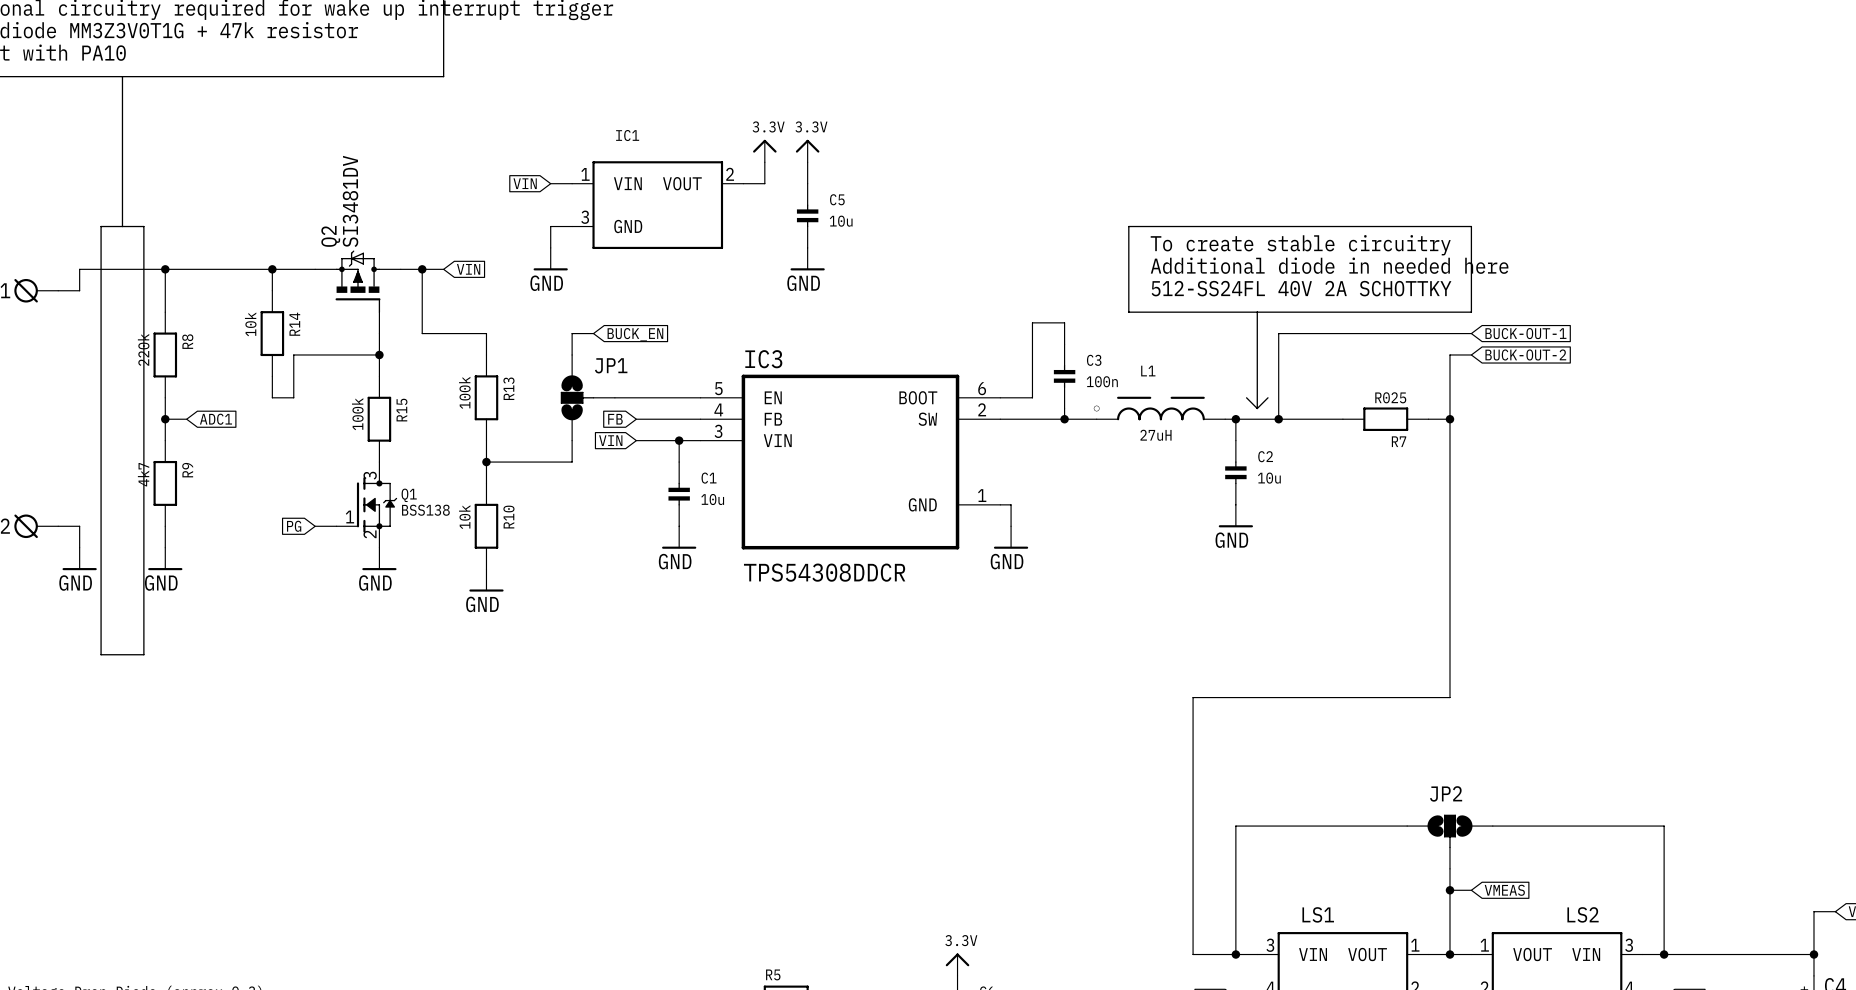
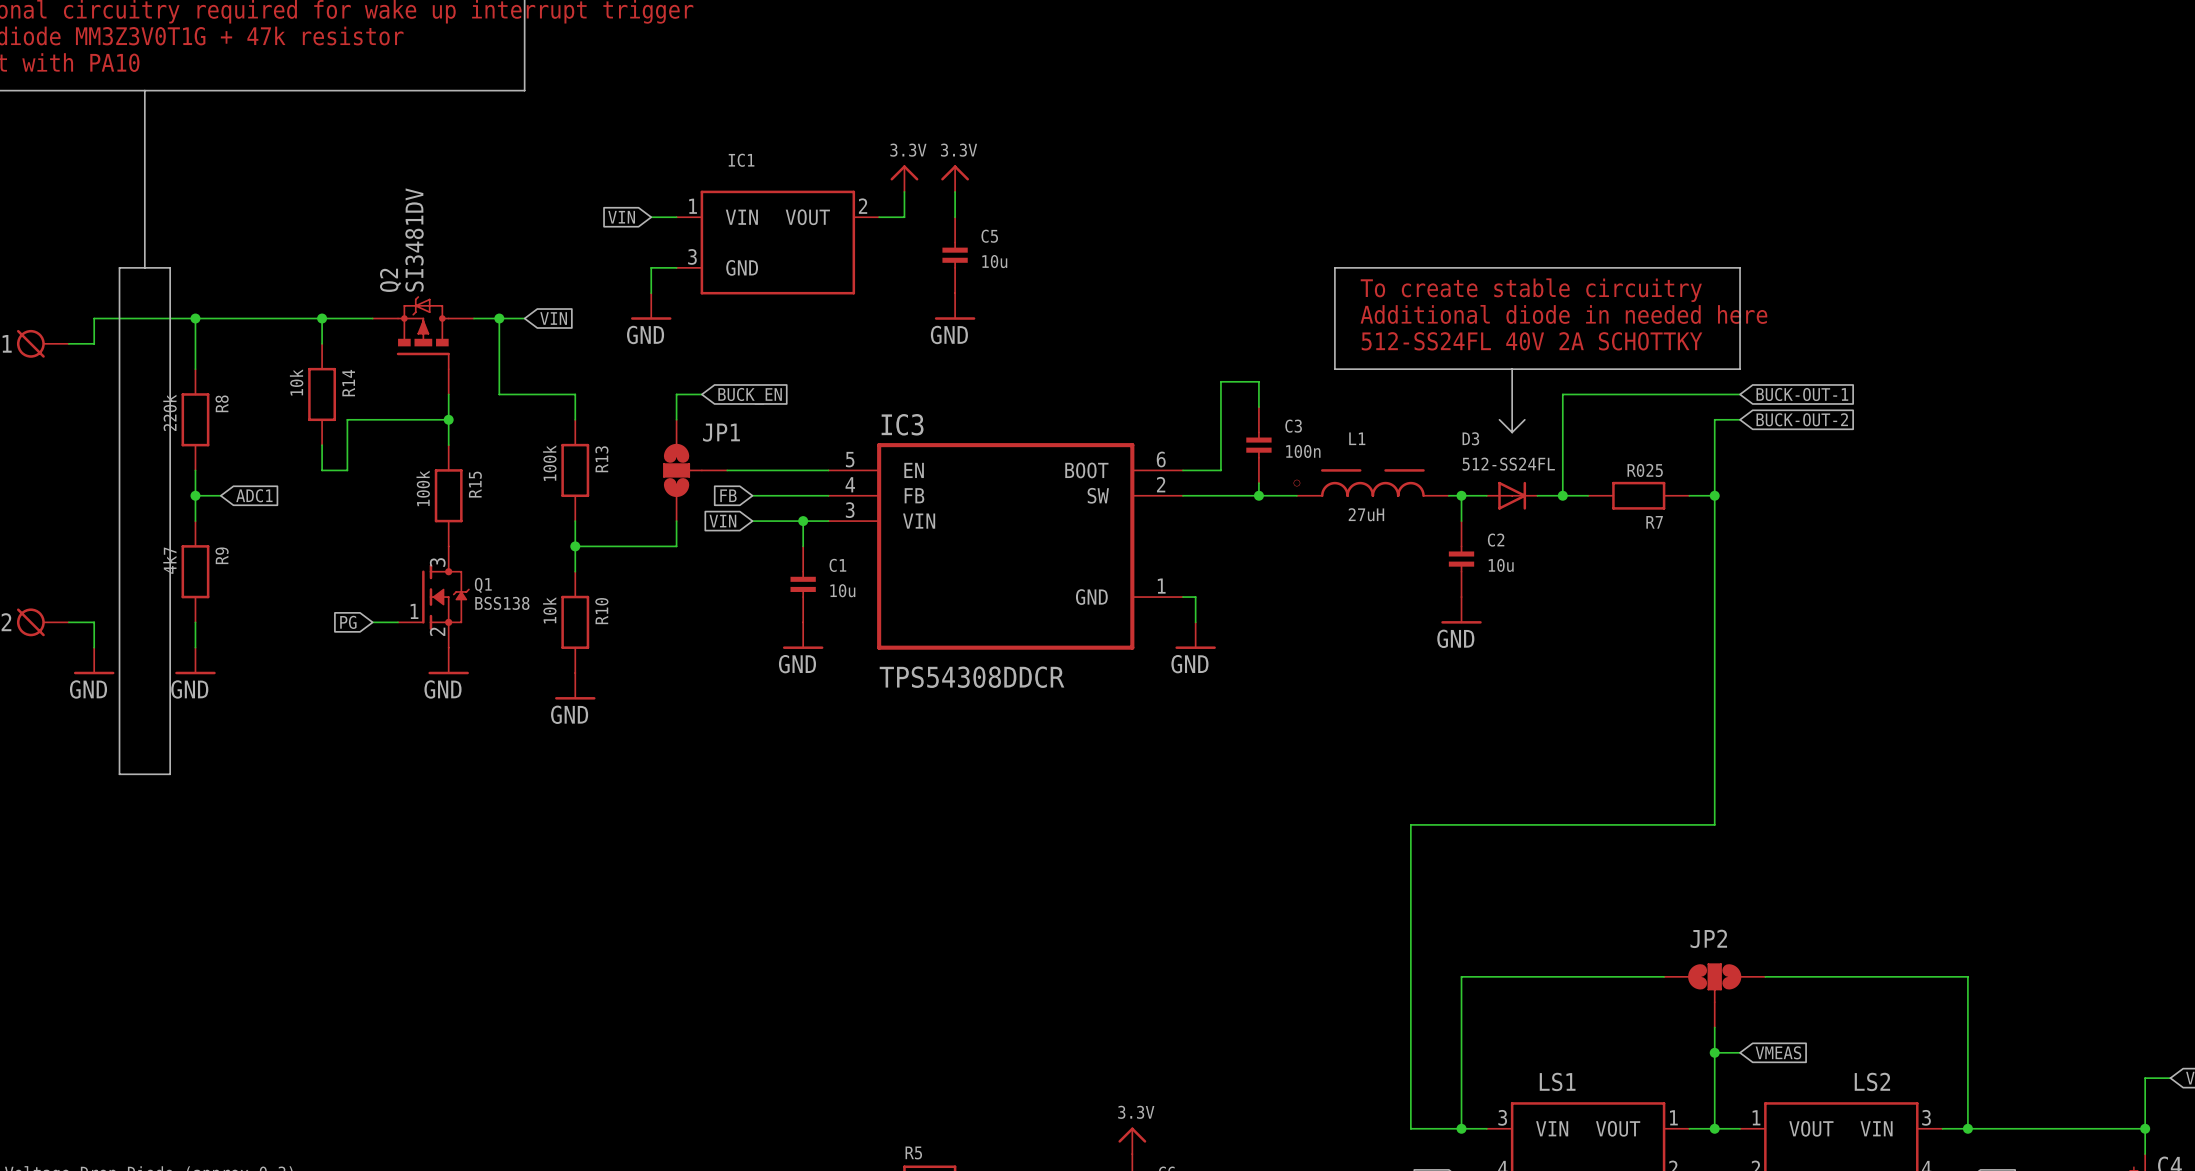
line: (1257, 312) (1257, 408) -> none
line: none -> (1512, 369) (1512, 432)
wire: (1321, 333) (1278, 333) (1278, 419) -> (1562, 394) (1562, 495)
line: (1246, 397) (1257, 408) -> (1499, 419) (1512, 432)
line: (1267, 397) (1257, 408) -> (1524, 419) (1512, 432)
junction position: (1278, 419) -> (1562, 495)
D3: none -> 512-SS24FL (1512, 495)

